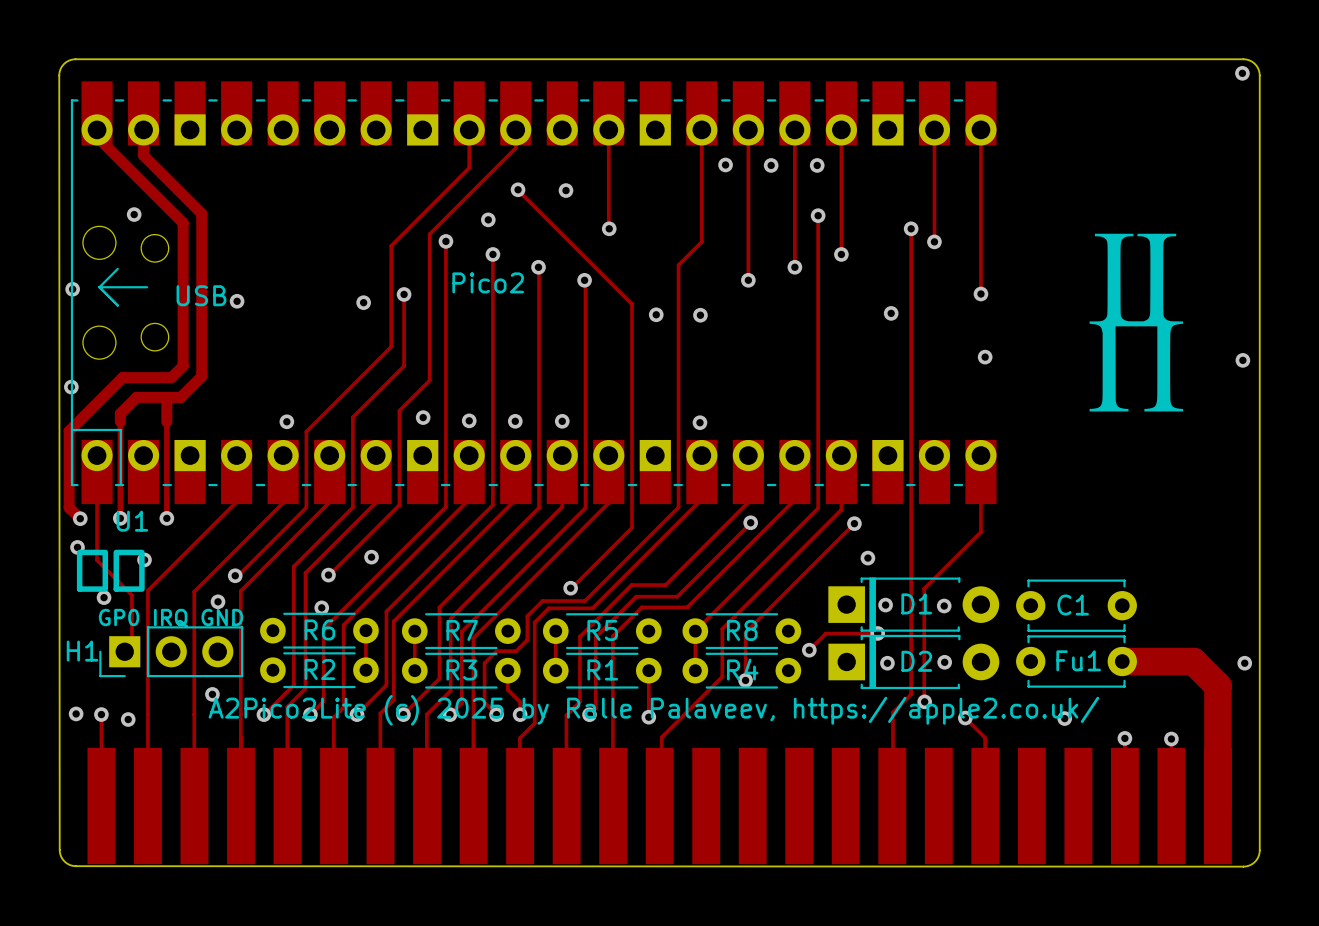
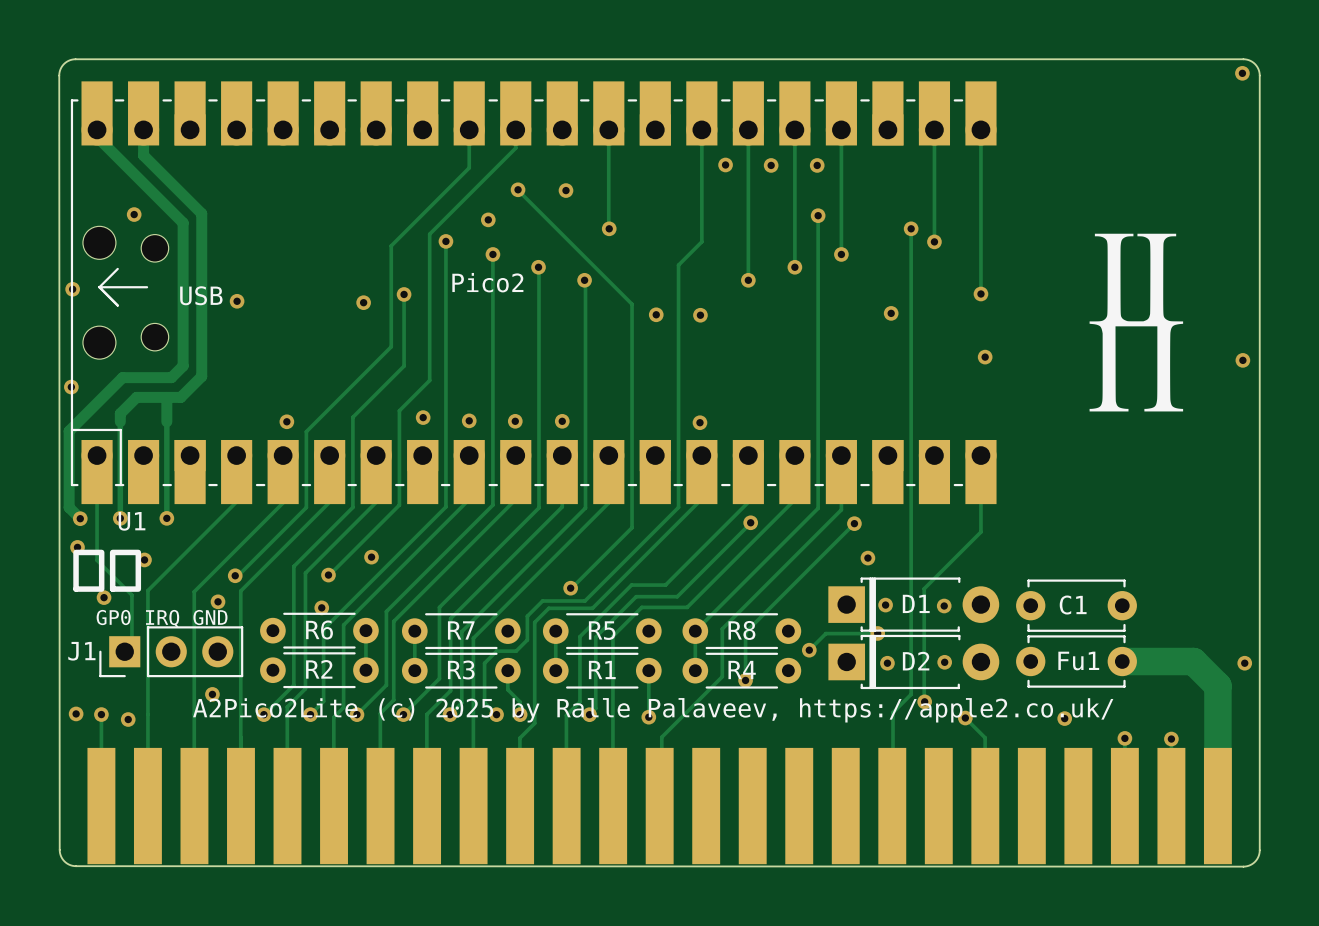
H1 name: H1 (82, 651) -> J1 (81, 651)

